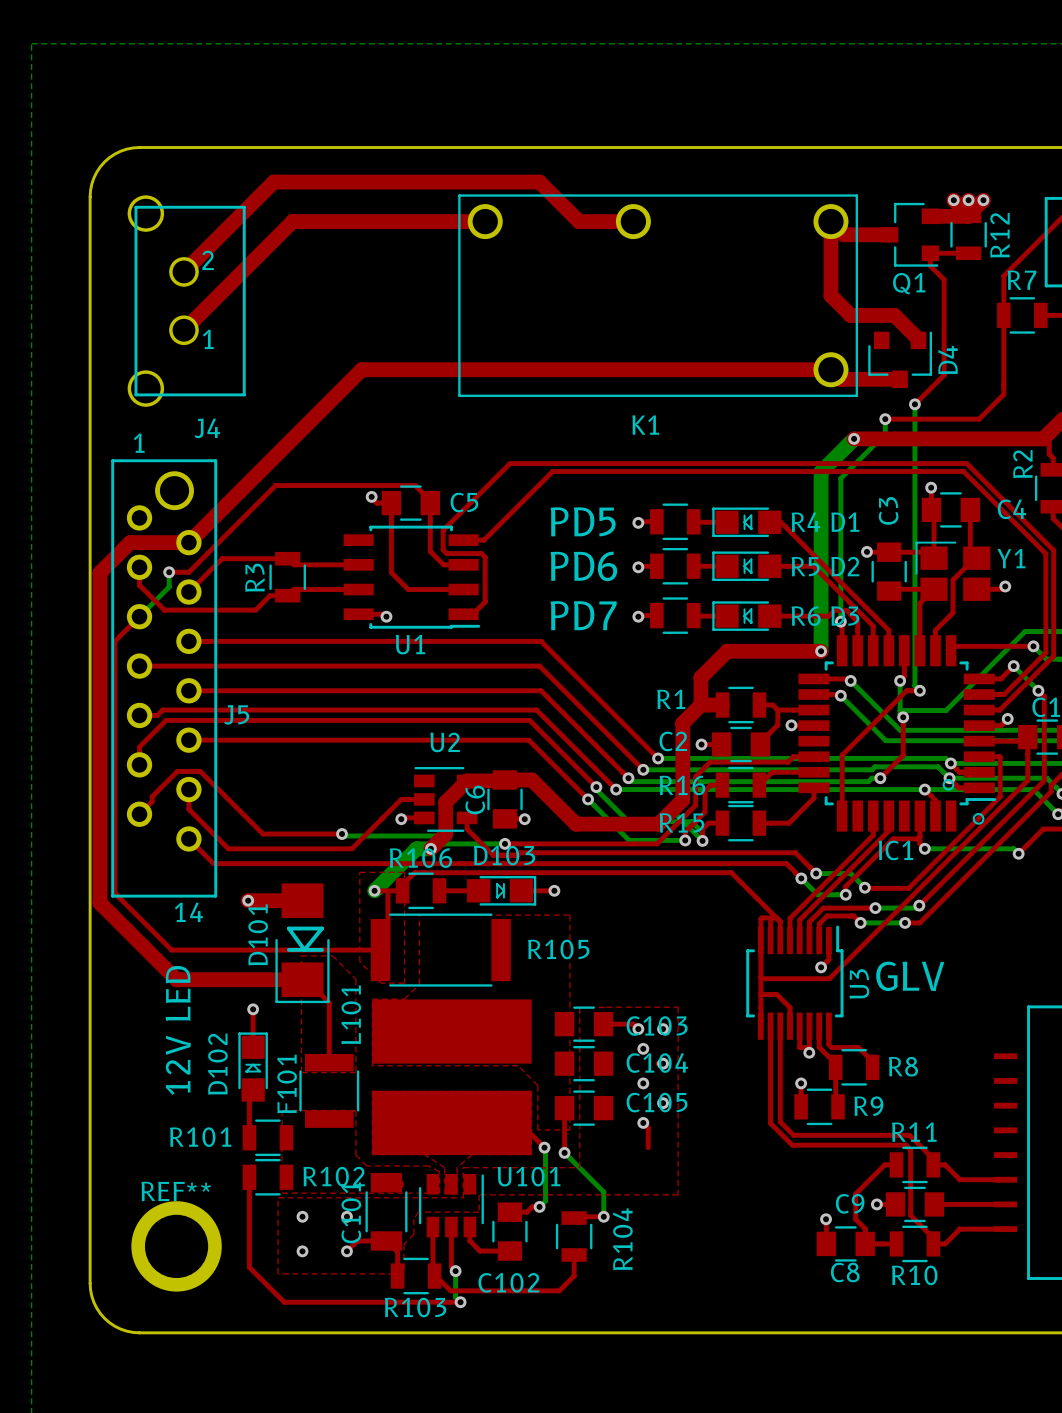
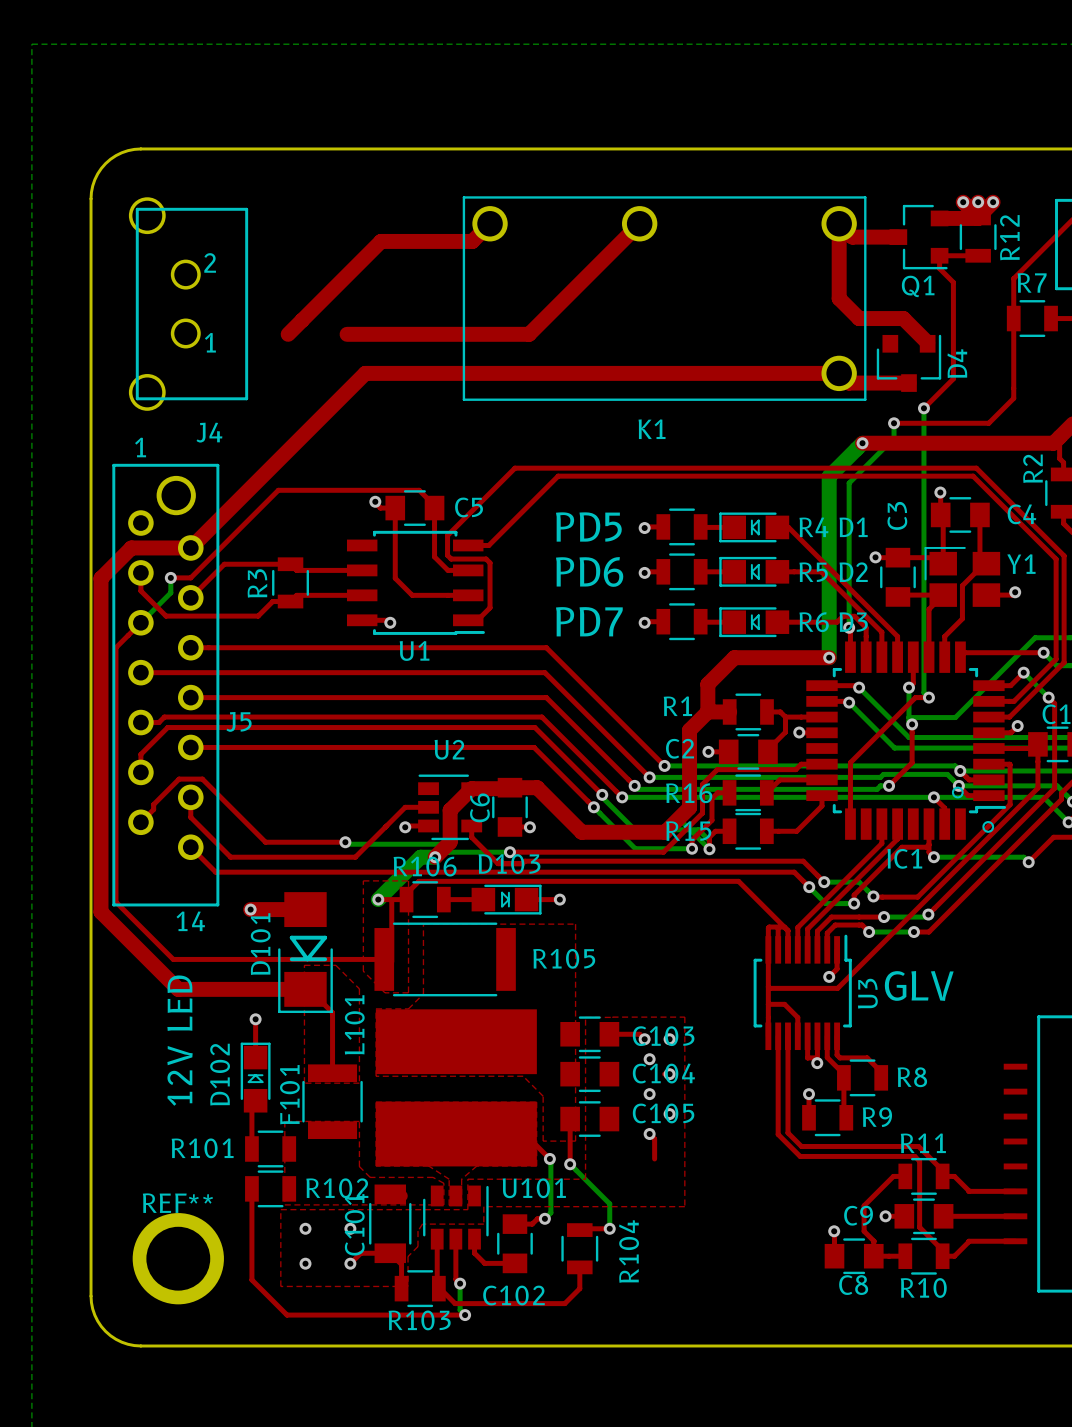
top track: (485, 221) (292, 221) (183, 330) -> (490, 223) (472, 241) (381, 241) (288, 334)
top track: (633, 221) (579, 221) (539, 182) (273, 182) (183, 271) -> (639, 223) (529, 334) (347, 334)

